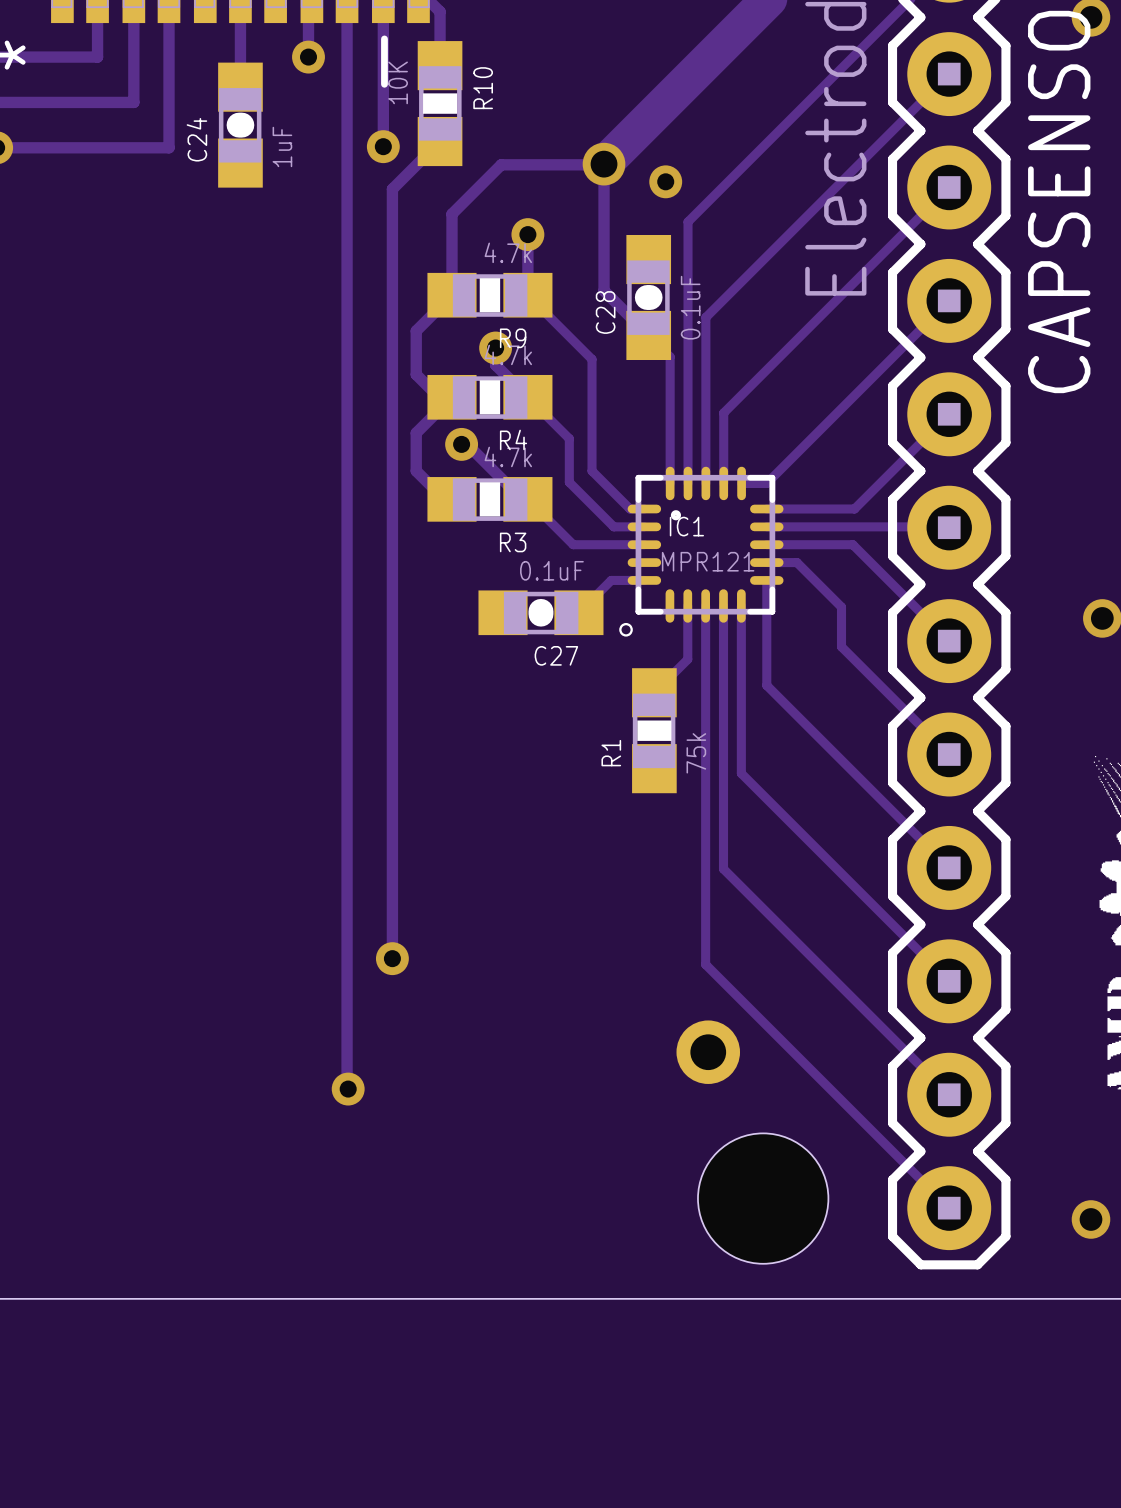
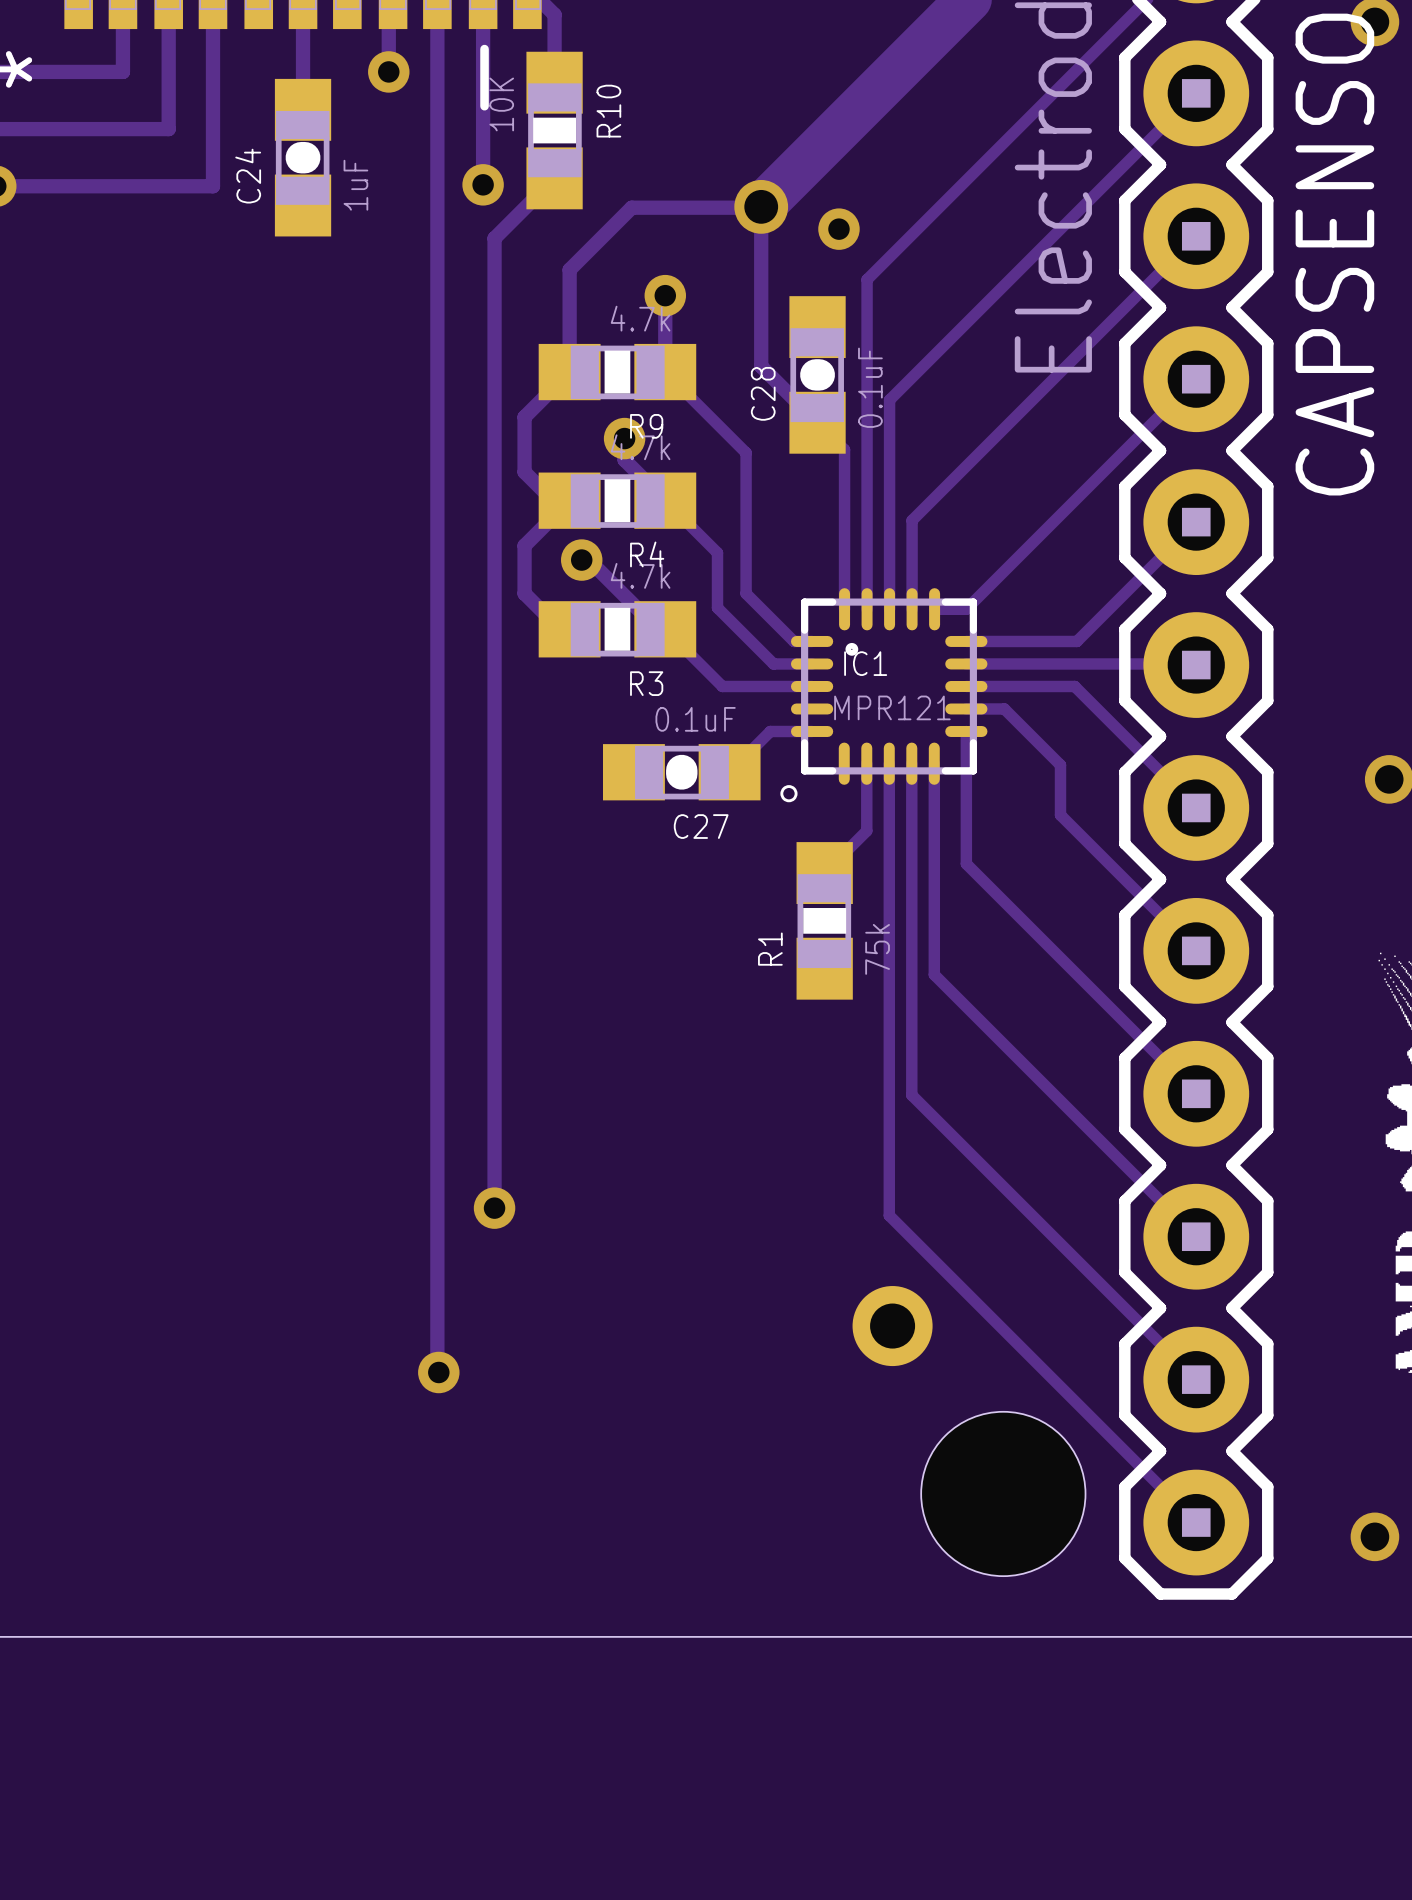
hole position: (763, 1198) -> (1003, 1493)

